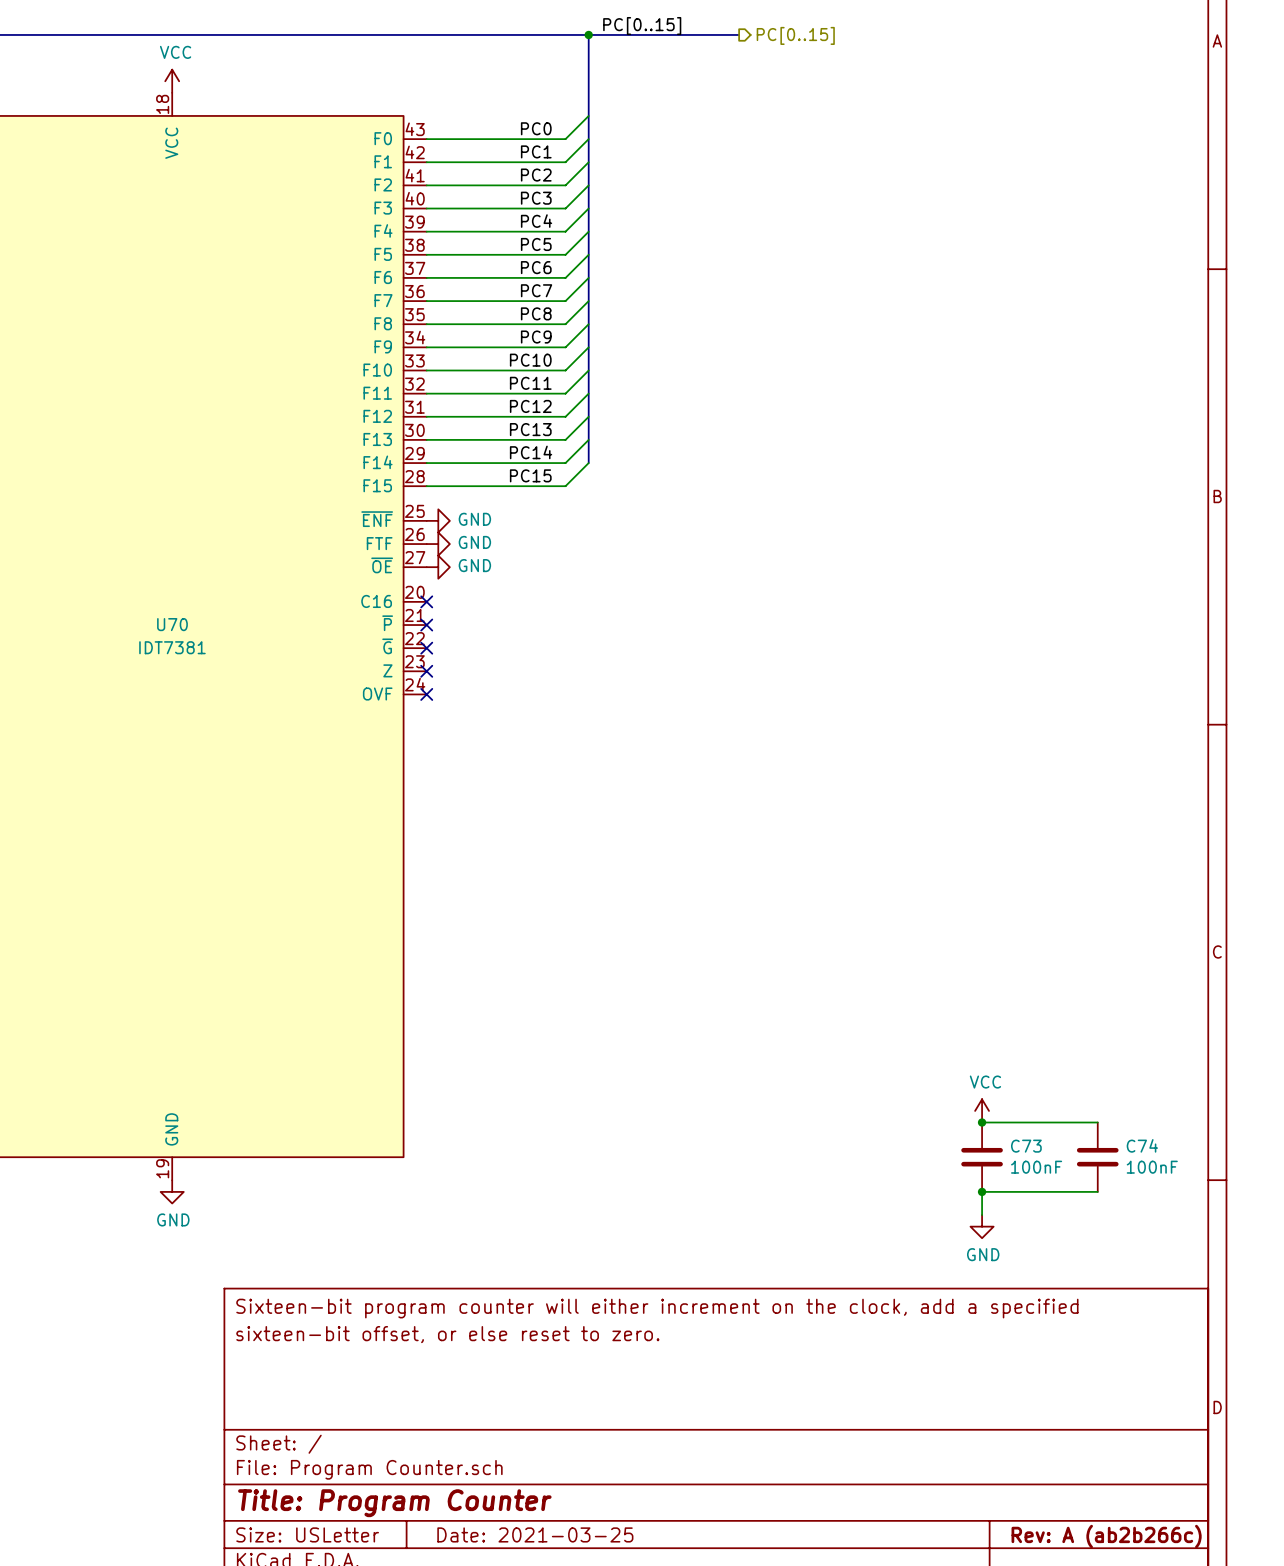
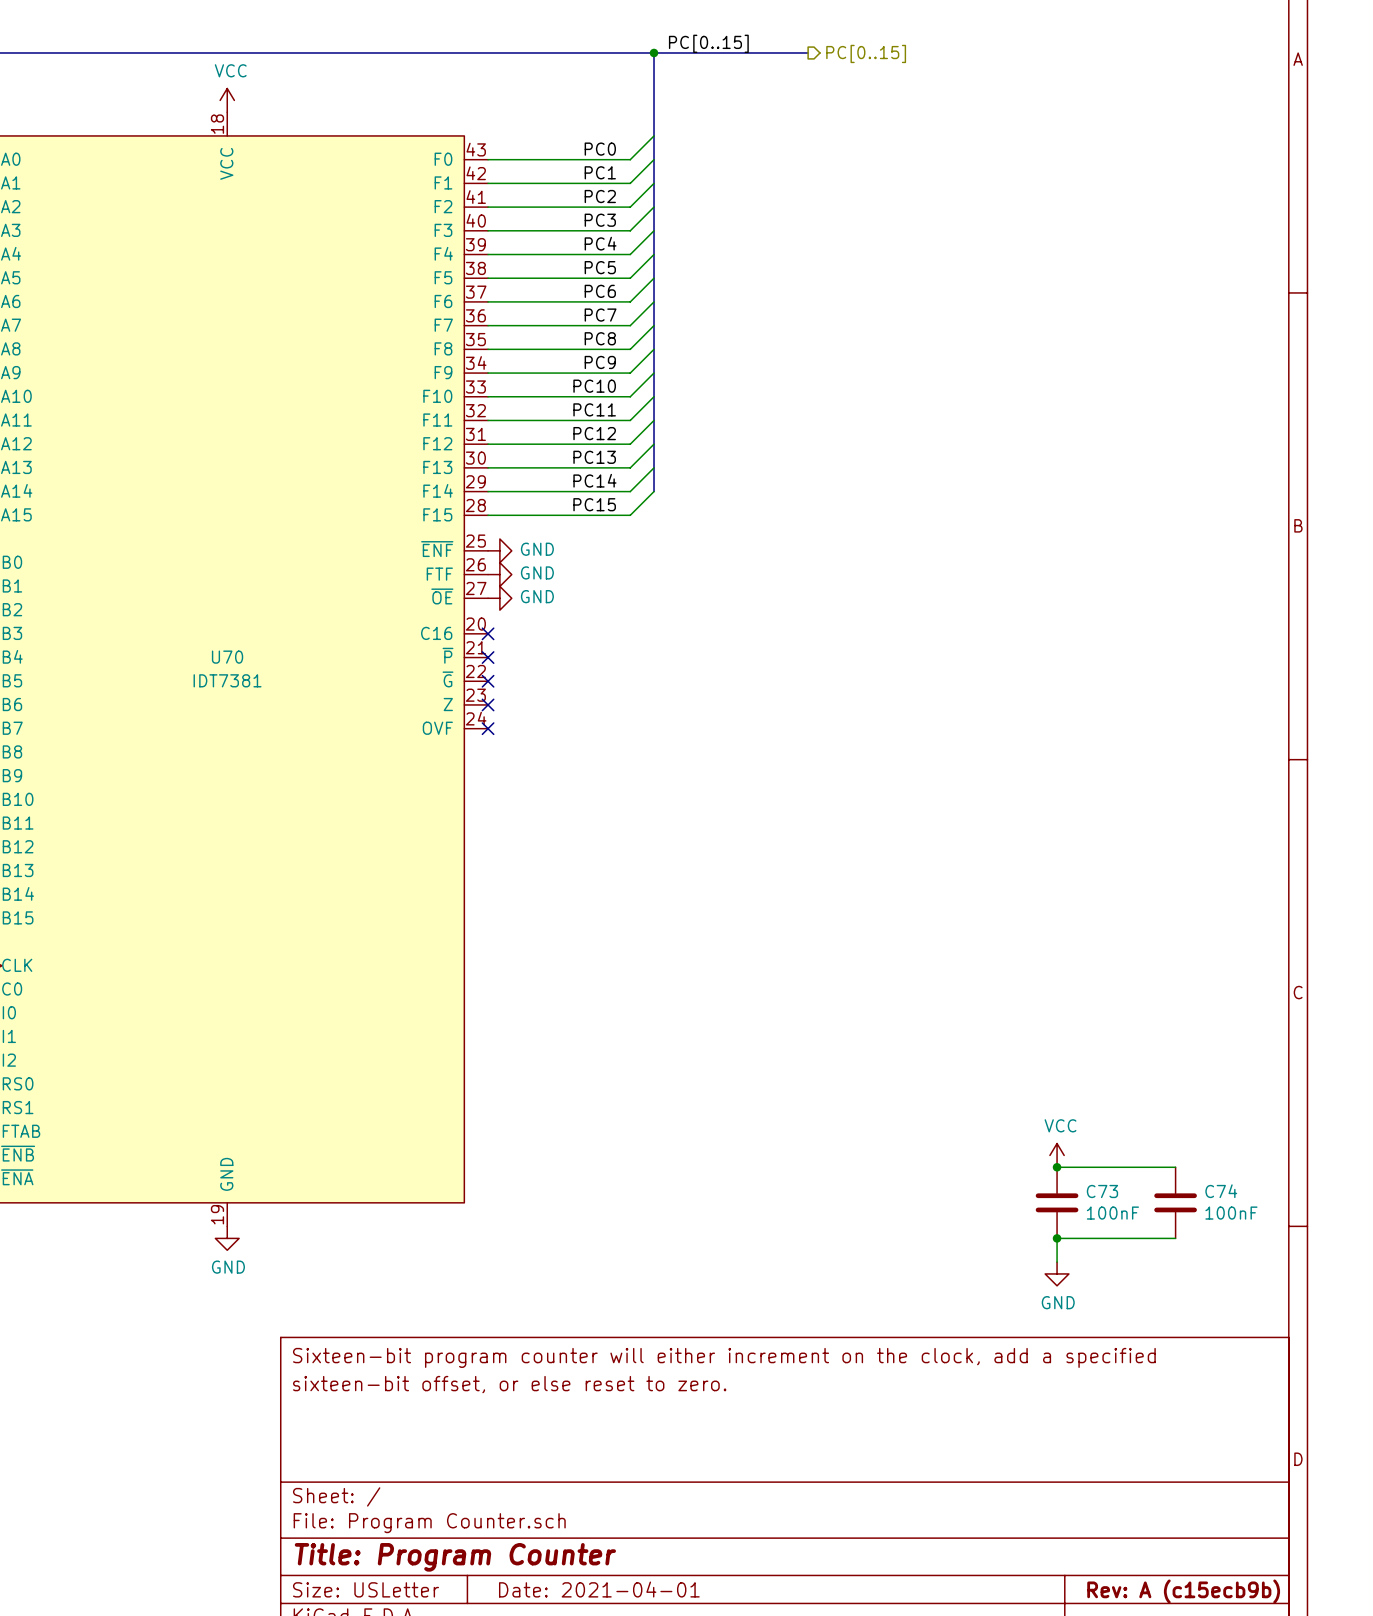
title block: Date: 2021-03-25 (535, 1534) -> Date: 2021-04-01 (599, 1589)
title block: Rev: A (ab2b266c) (1106, 1536) -> Rev: A (c15ecb9b) (1183, 1591)

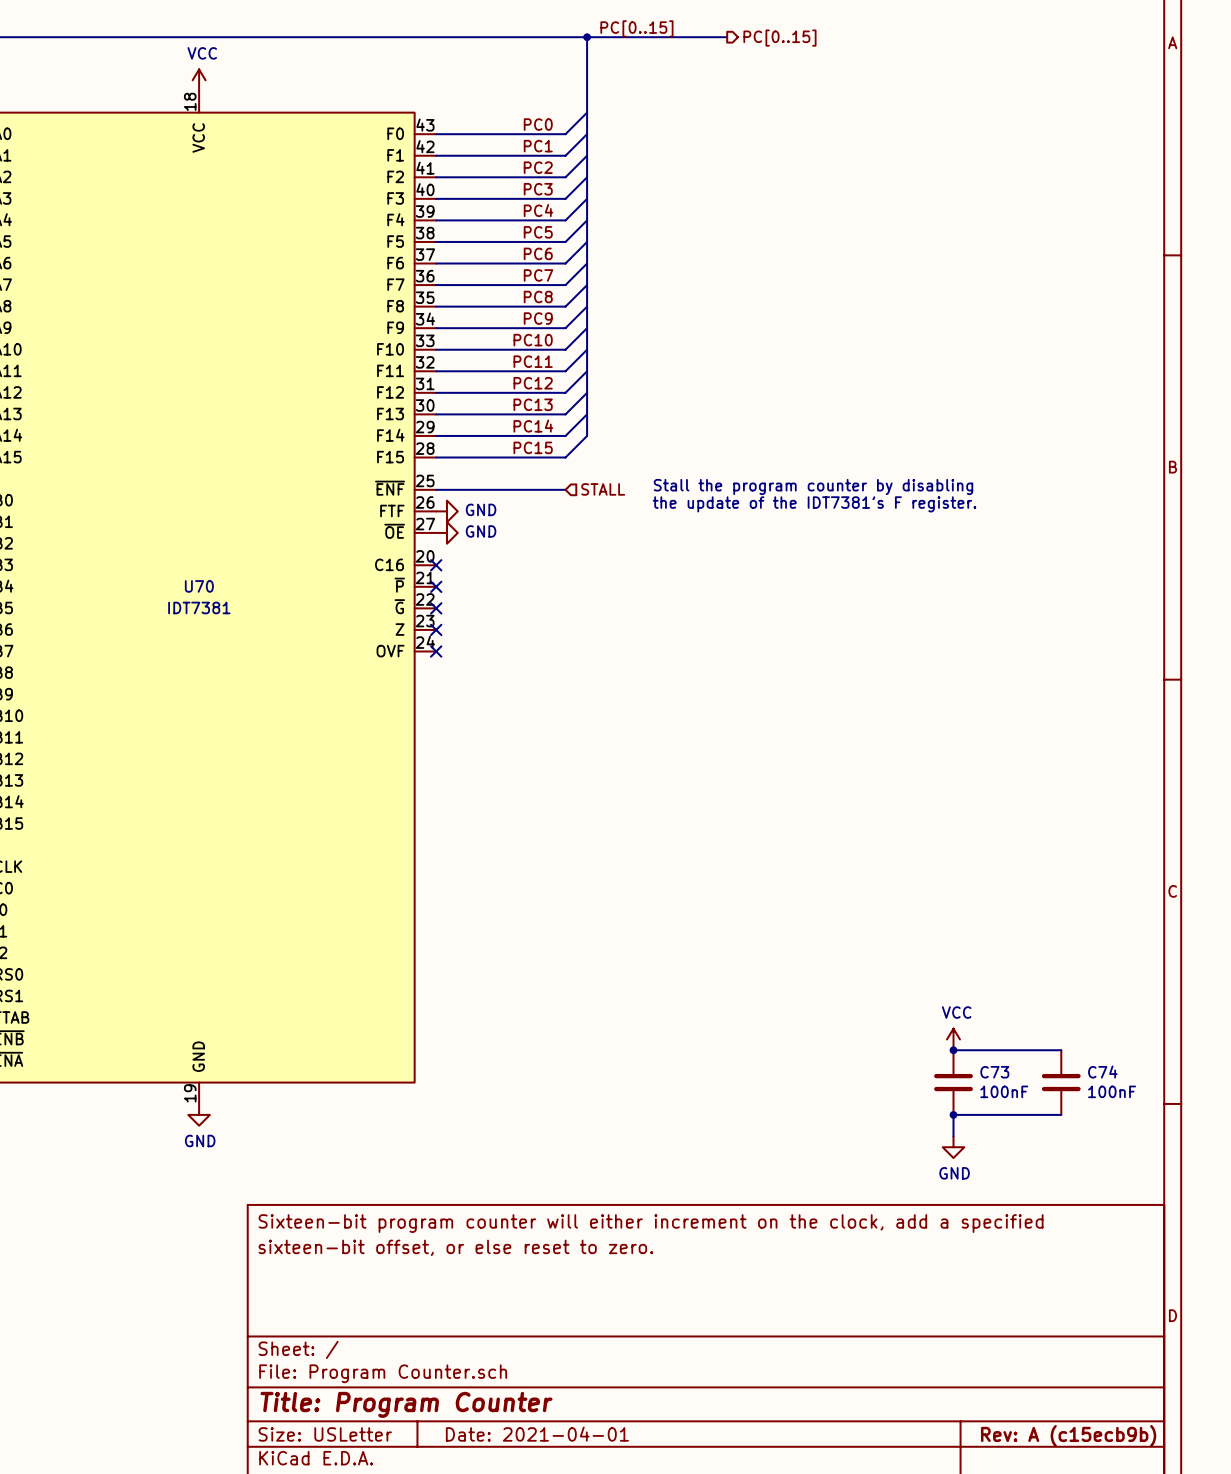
text: none -> Stall the program counter by disabling (813, 487)
wire: none -> (436, 489) (565, 489)
power symbol: GND (499, 550) -> none
hierarchical label: none -> STALL (603, 489)
text: none -> the update of the IDT7381’s F register. (814, 504)

